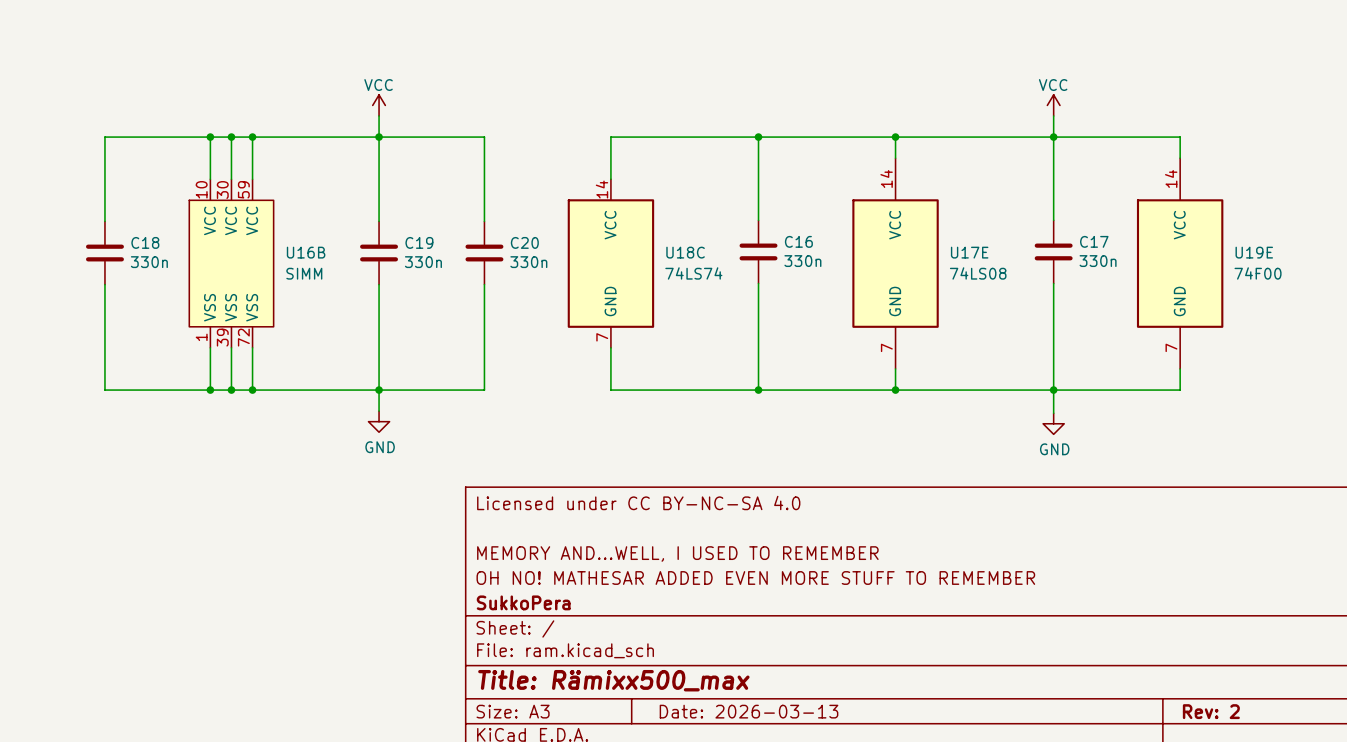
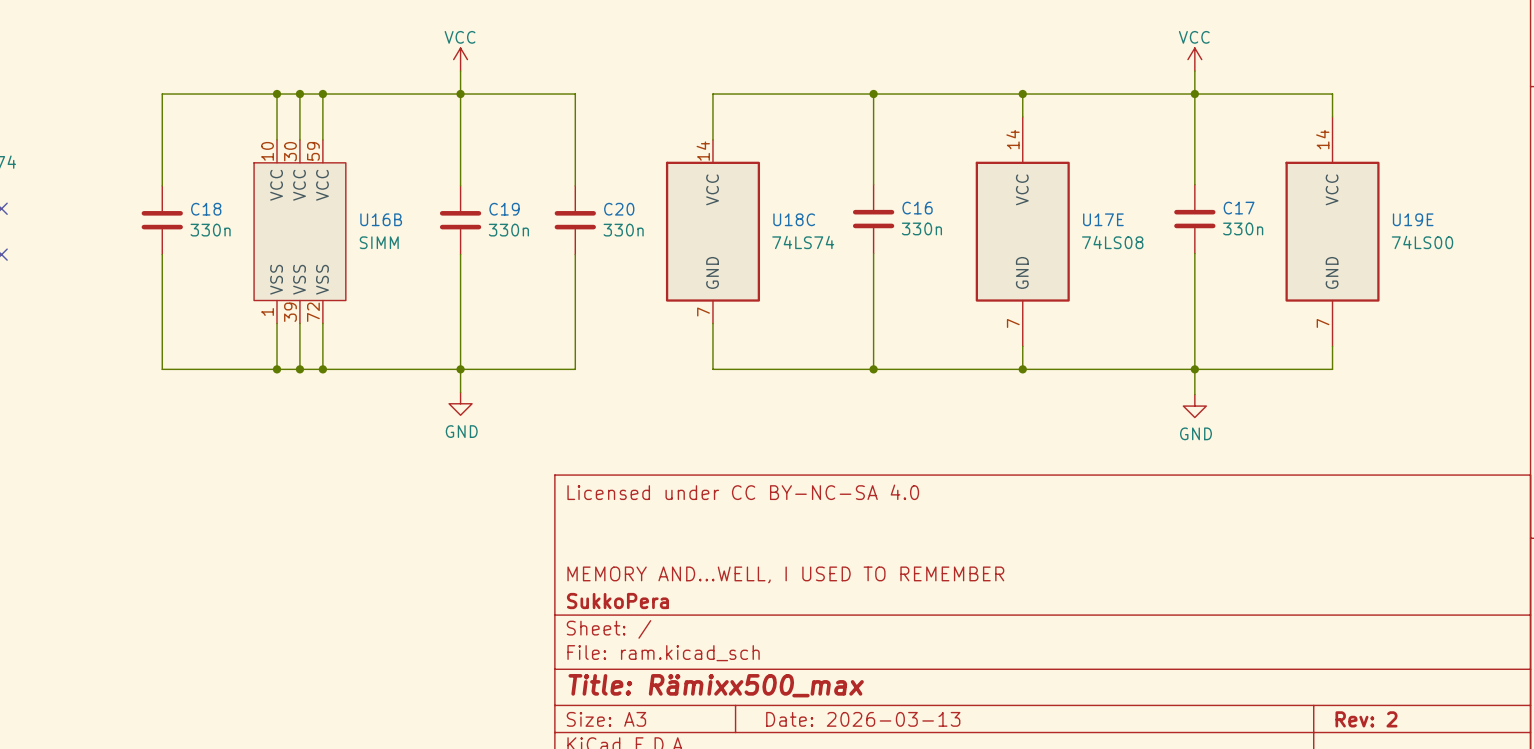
U19E value: 74F00 (1258, 273) -> 74LS00 (1422, 242)
title block: MEMORY AND...WELL, I USED TO REMEMBER (677, 553) -> none
title block: OH NO! MATHESAR ADDED EVEN MORE STUFF TO REMEMBER (755, 577) -> MEMORY AND...WELL, I USED TO REMEMBER (785, 574)

